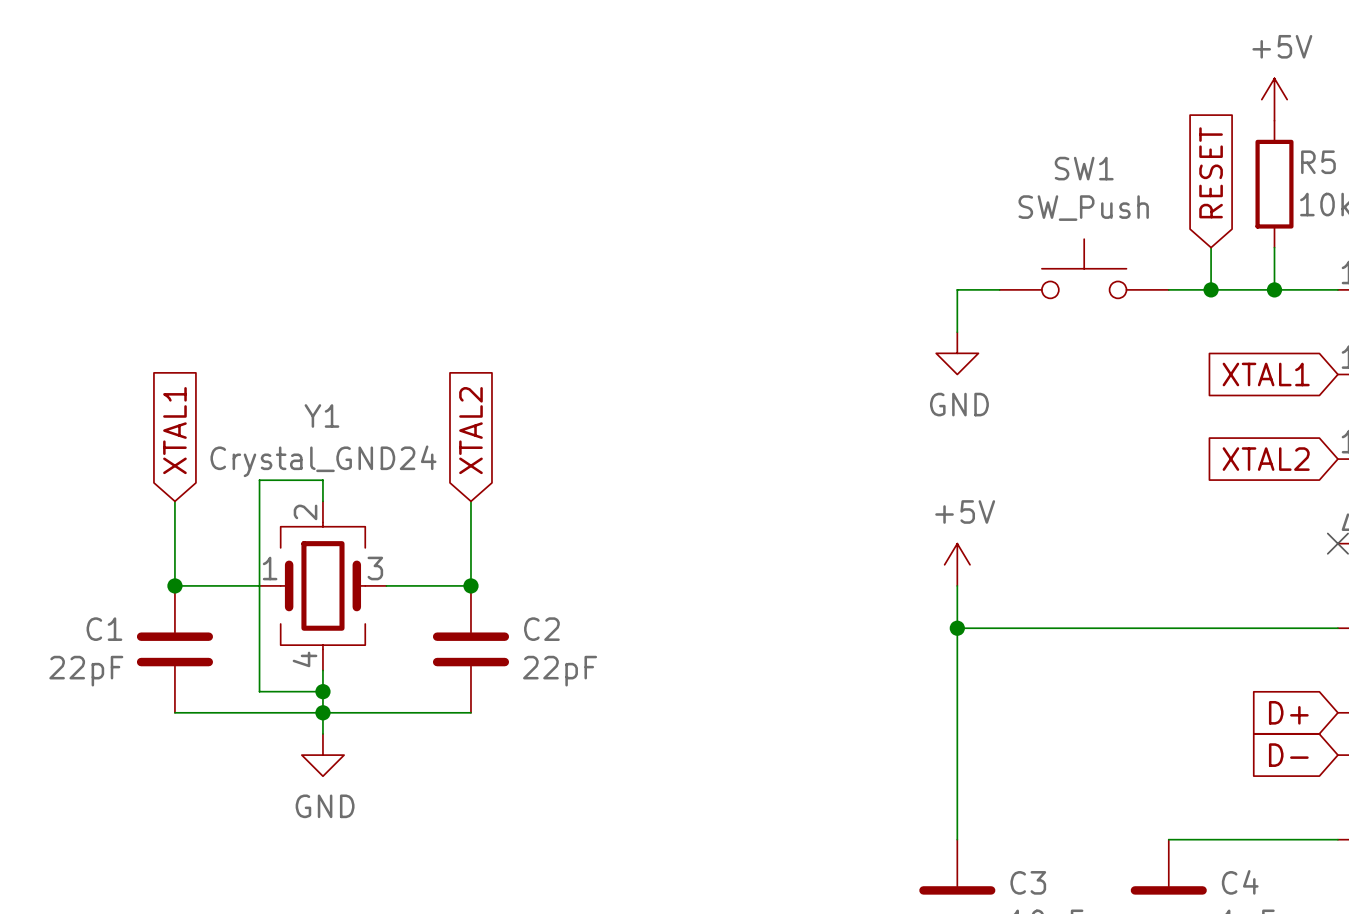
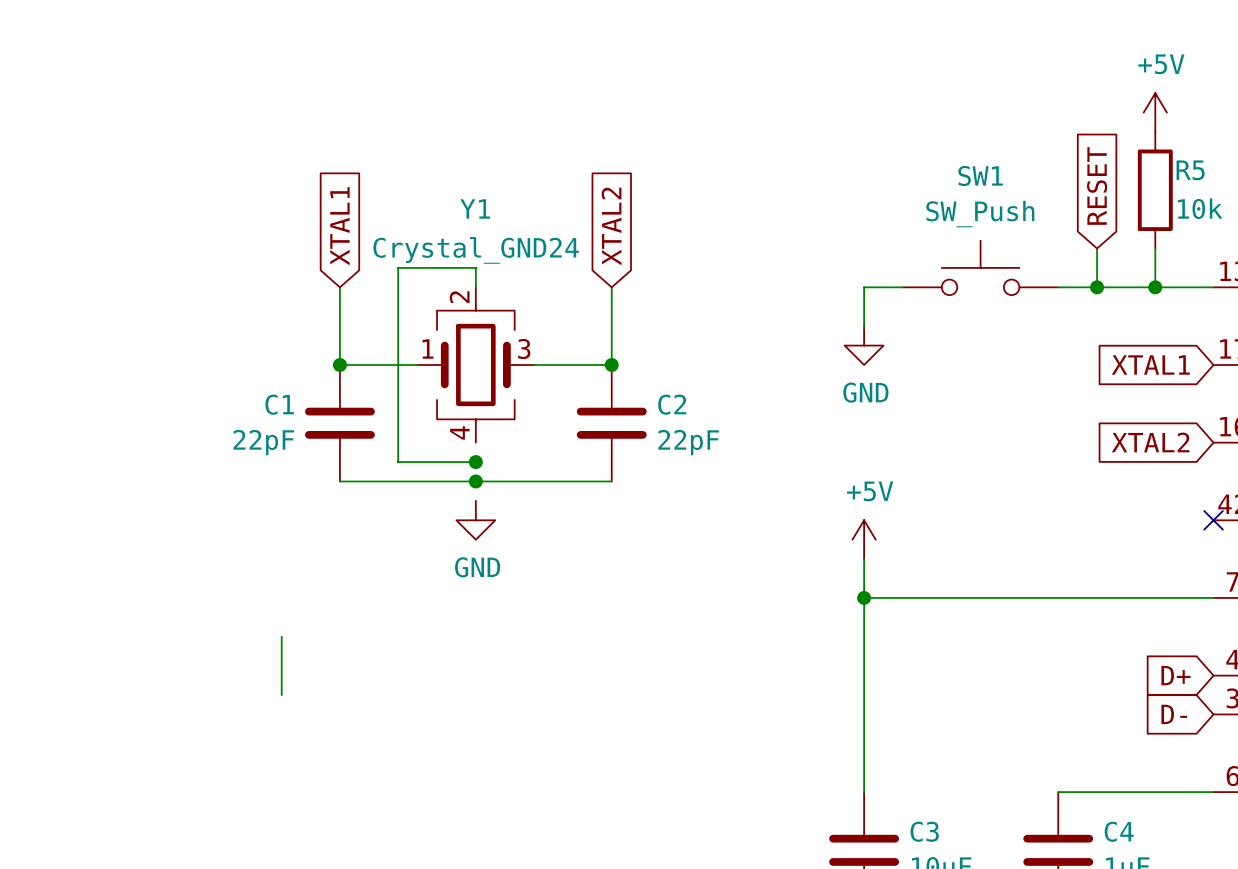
wire: none -> (475, 287) (475, 267) (398, 267) (398, 462) (475, 462)
junction: none -> (339, 364)
junction: none -> (611, 364)
global label position: XTAL1 (174, 430) -> XTAL1 (339, 226)
global label position: XTAL2 (470, 430) -> XTAL2 (611, 226)
junction: none -> (475, 462)
wire: (174, 501) (174, 585) (259, 585) -> (339, 287) (339, 364) (417, 364)
wire: (322, 501) (322, 480) (259, 480) (259, 691) (322, 691) -> none
wire: (470, 501) (470, 585) (386, 585) -> (611, 287) (611, 364) (534, 364)
junction: none -> (475, 481)
junction: (174, 585) -> none
Y1 position: (322, 585) -> (475, 364)
junction: (470, 585) -> none
C1 position: (174, 649) -> (339, 423)
C2 position: (470, 649) -> (611, 423)
junction: (322, 691) -> none
wire: (174, 712) (470, 712) -> (339, 481) (611, 481)
junction: (322, 712) -> none
power symbol position: GND (322, 755) -> GND (475, 520)

